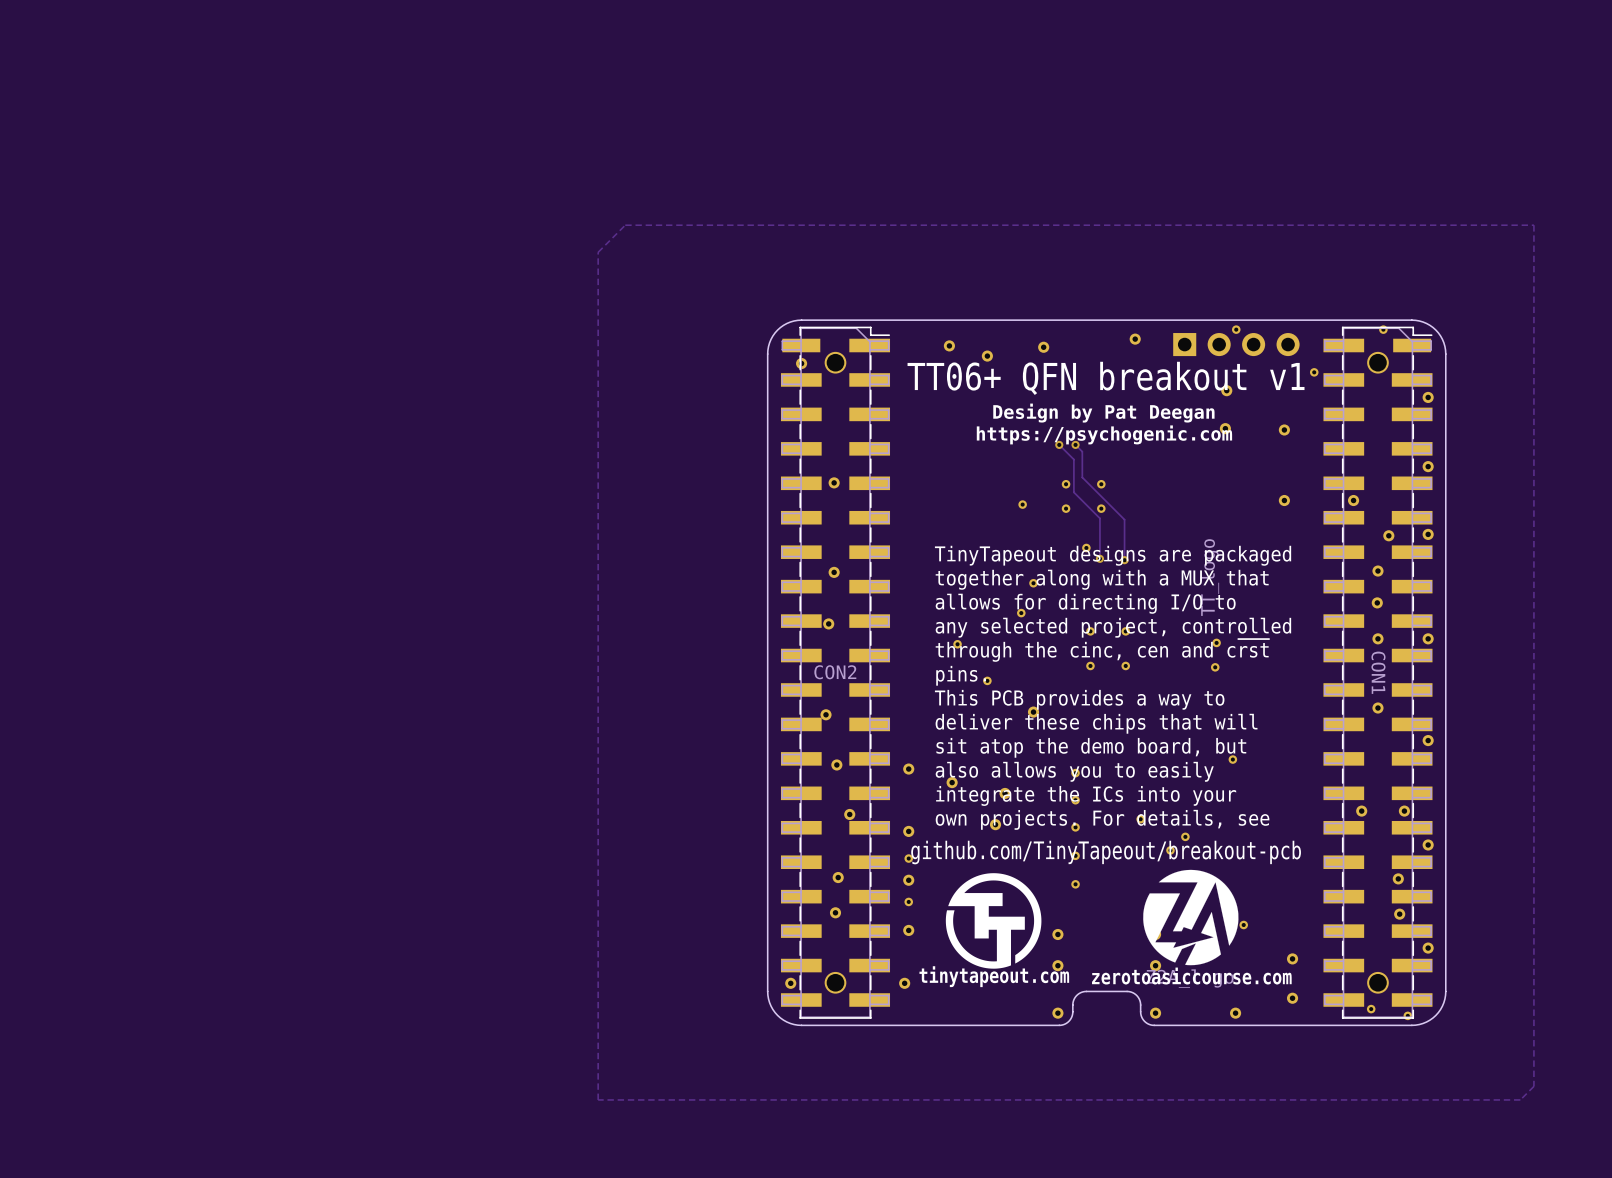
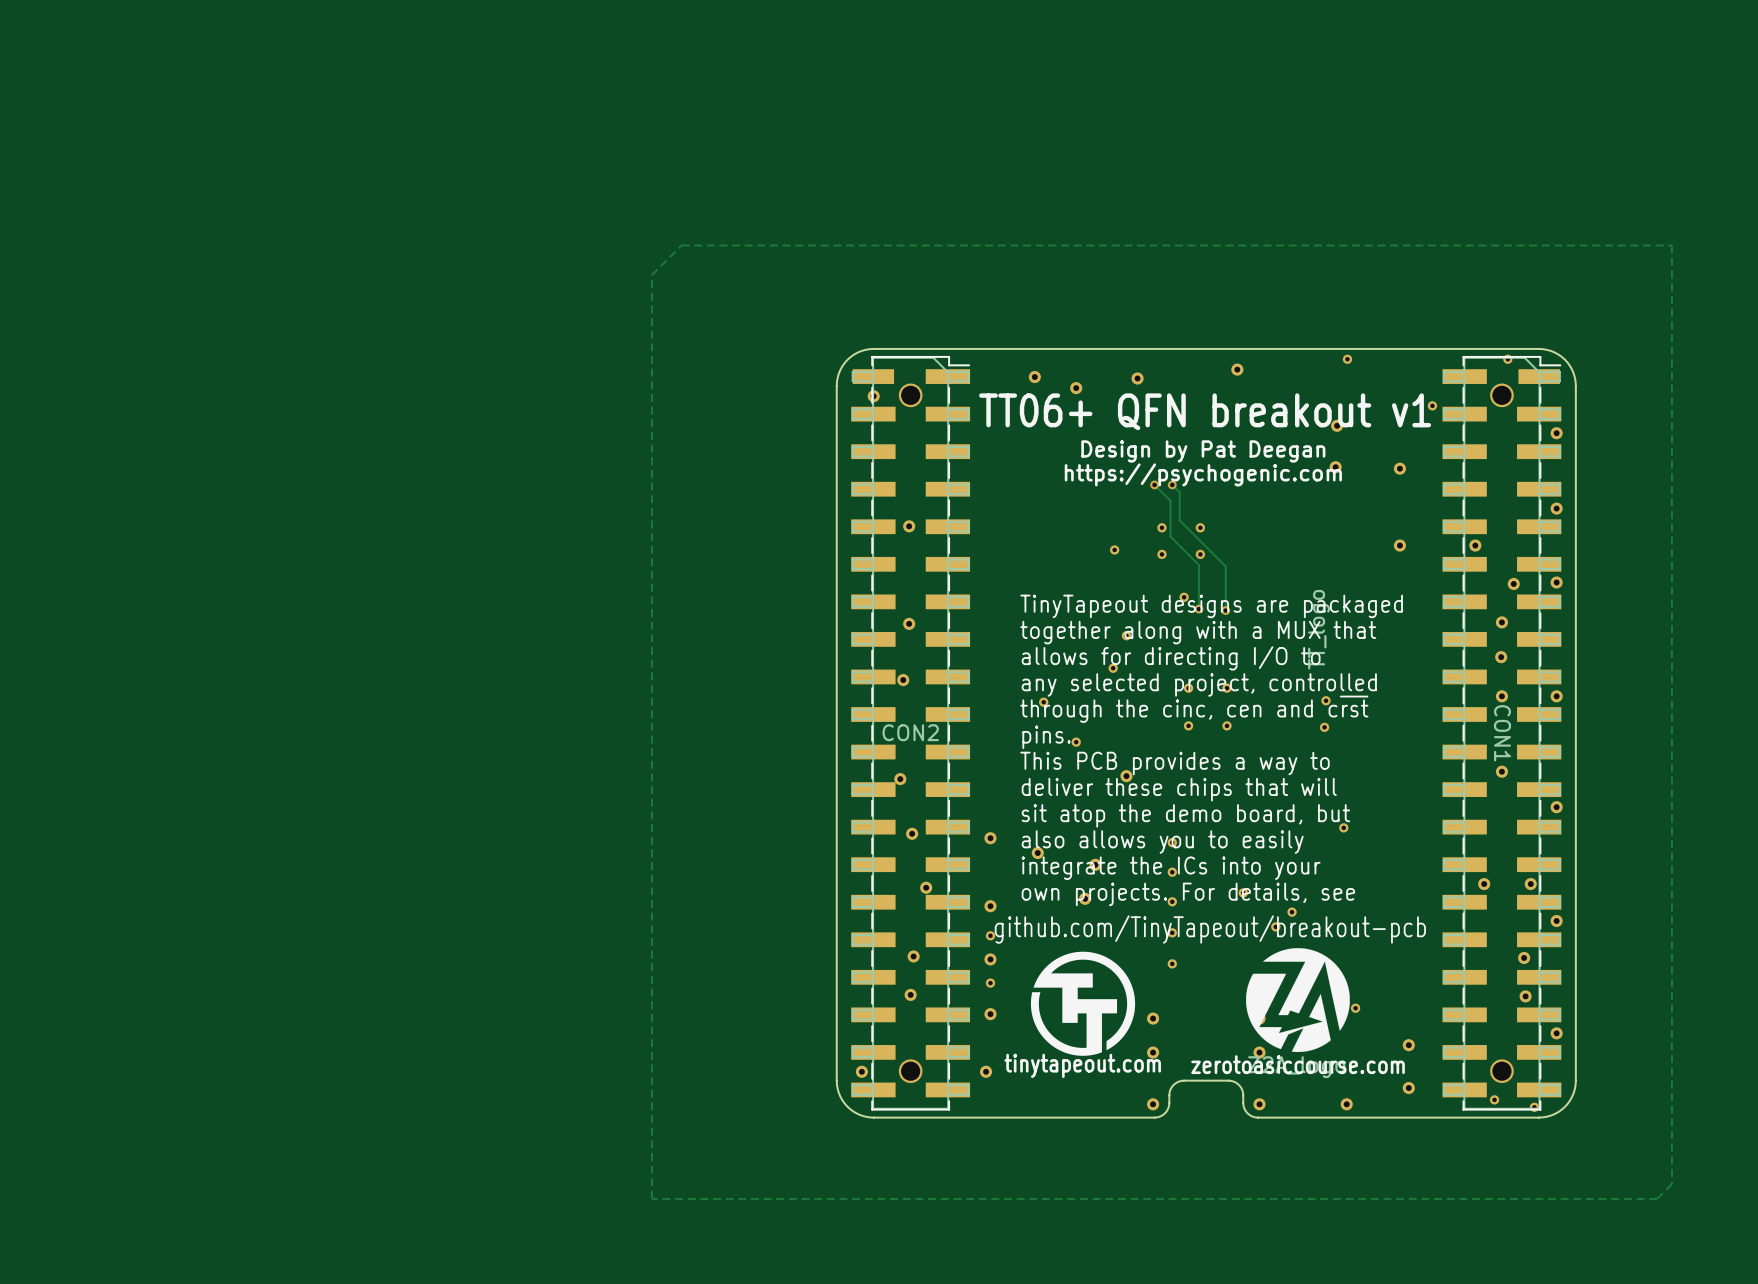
part: (1236, 344) -> none

